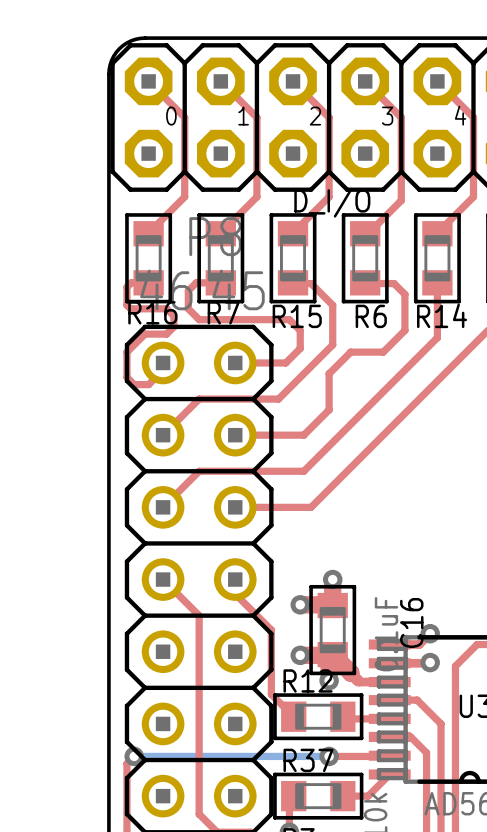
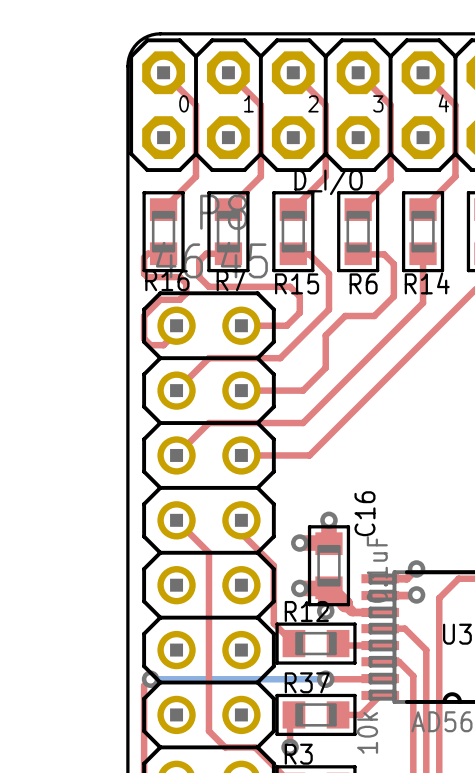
C16 name position: C16 (411, 623) -> C16 (364, 513)

